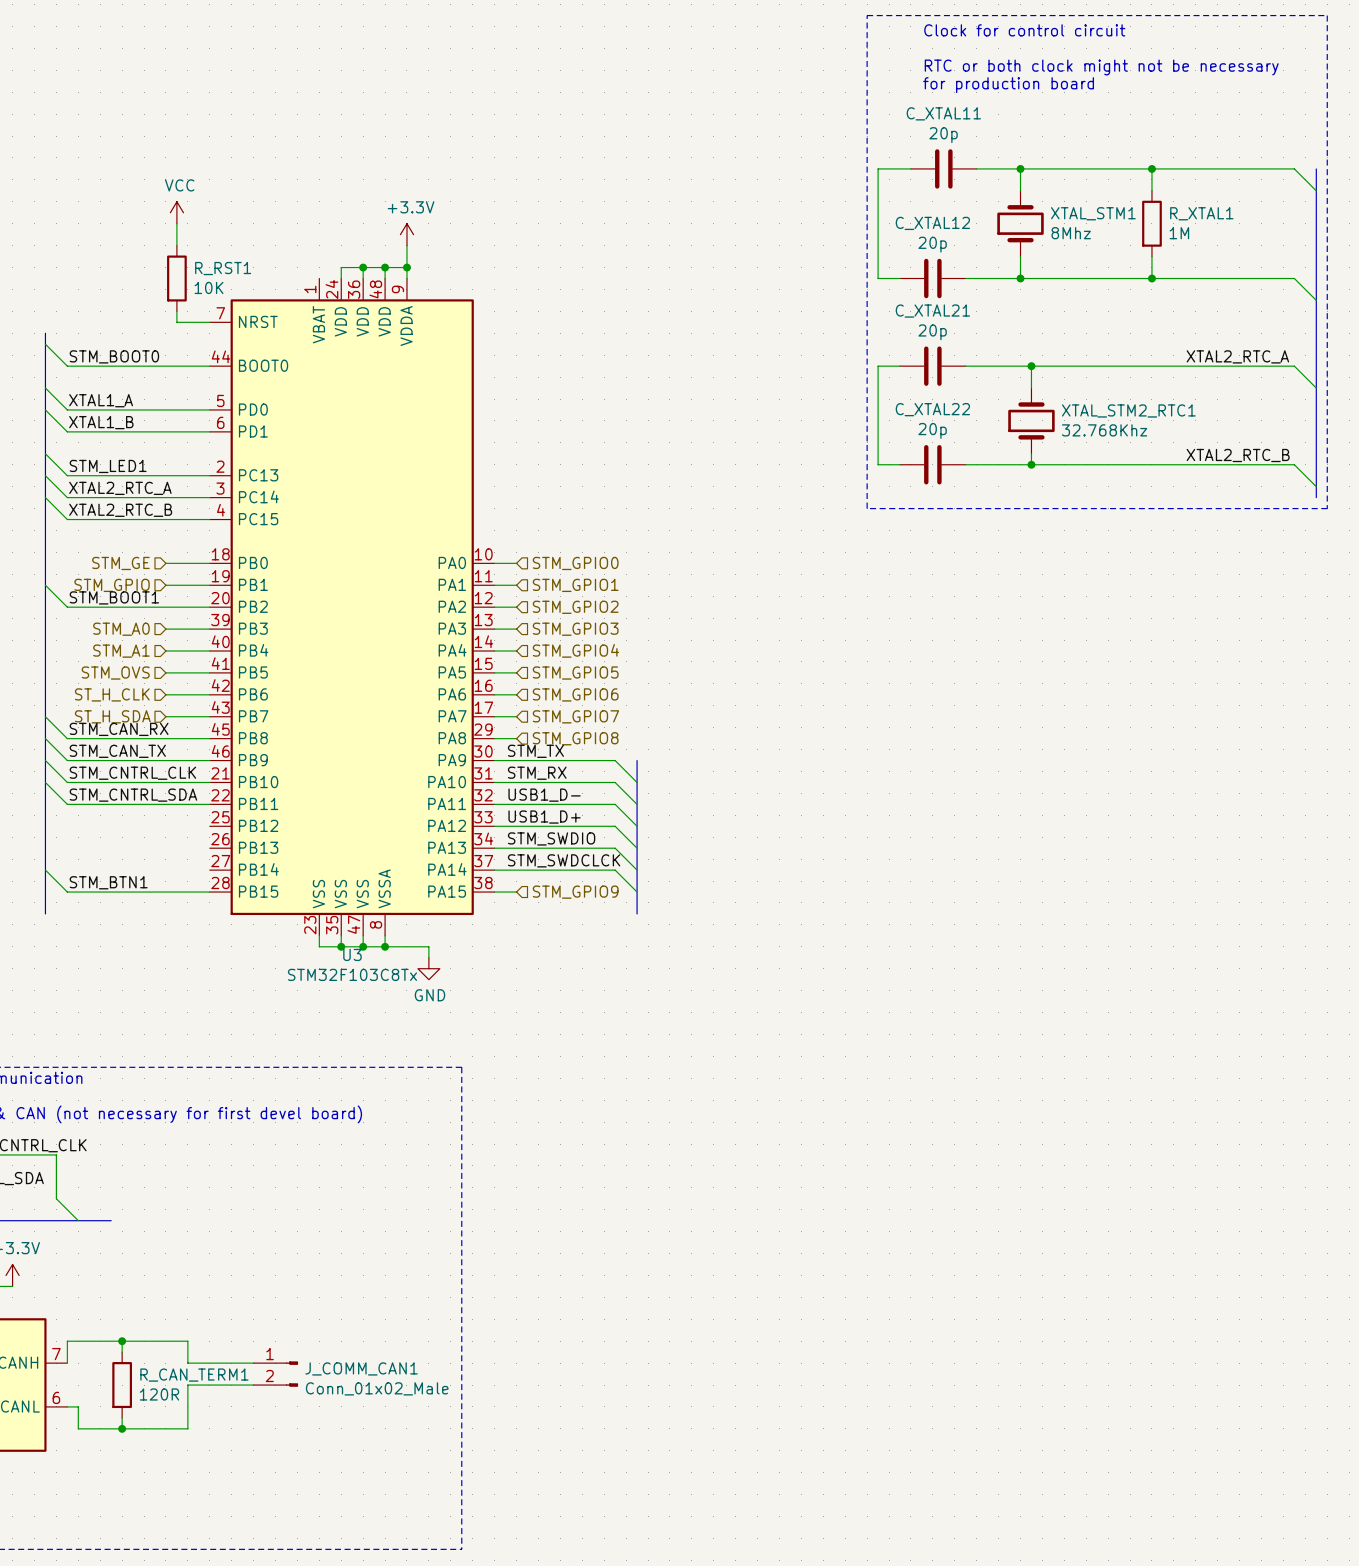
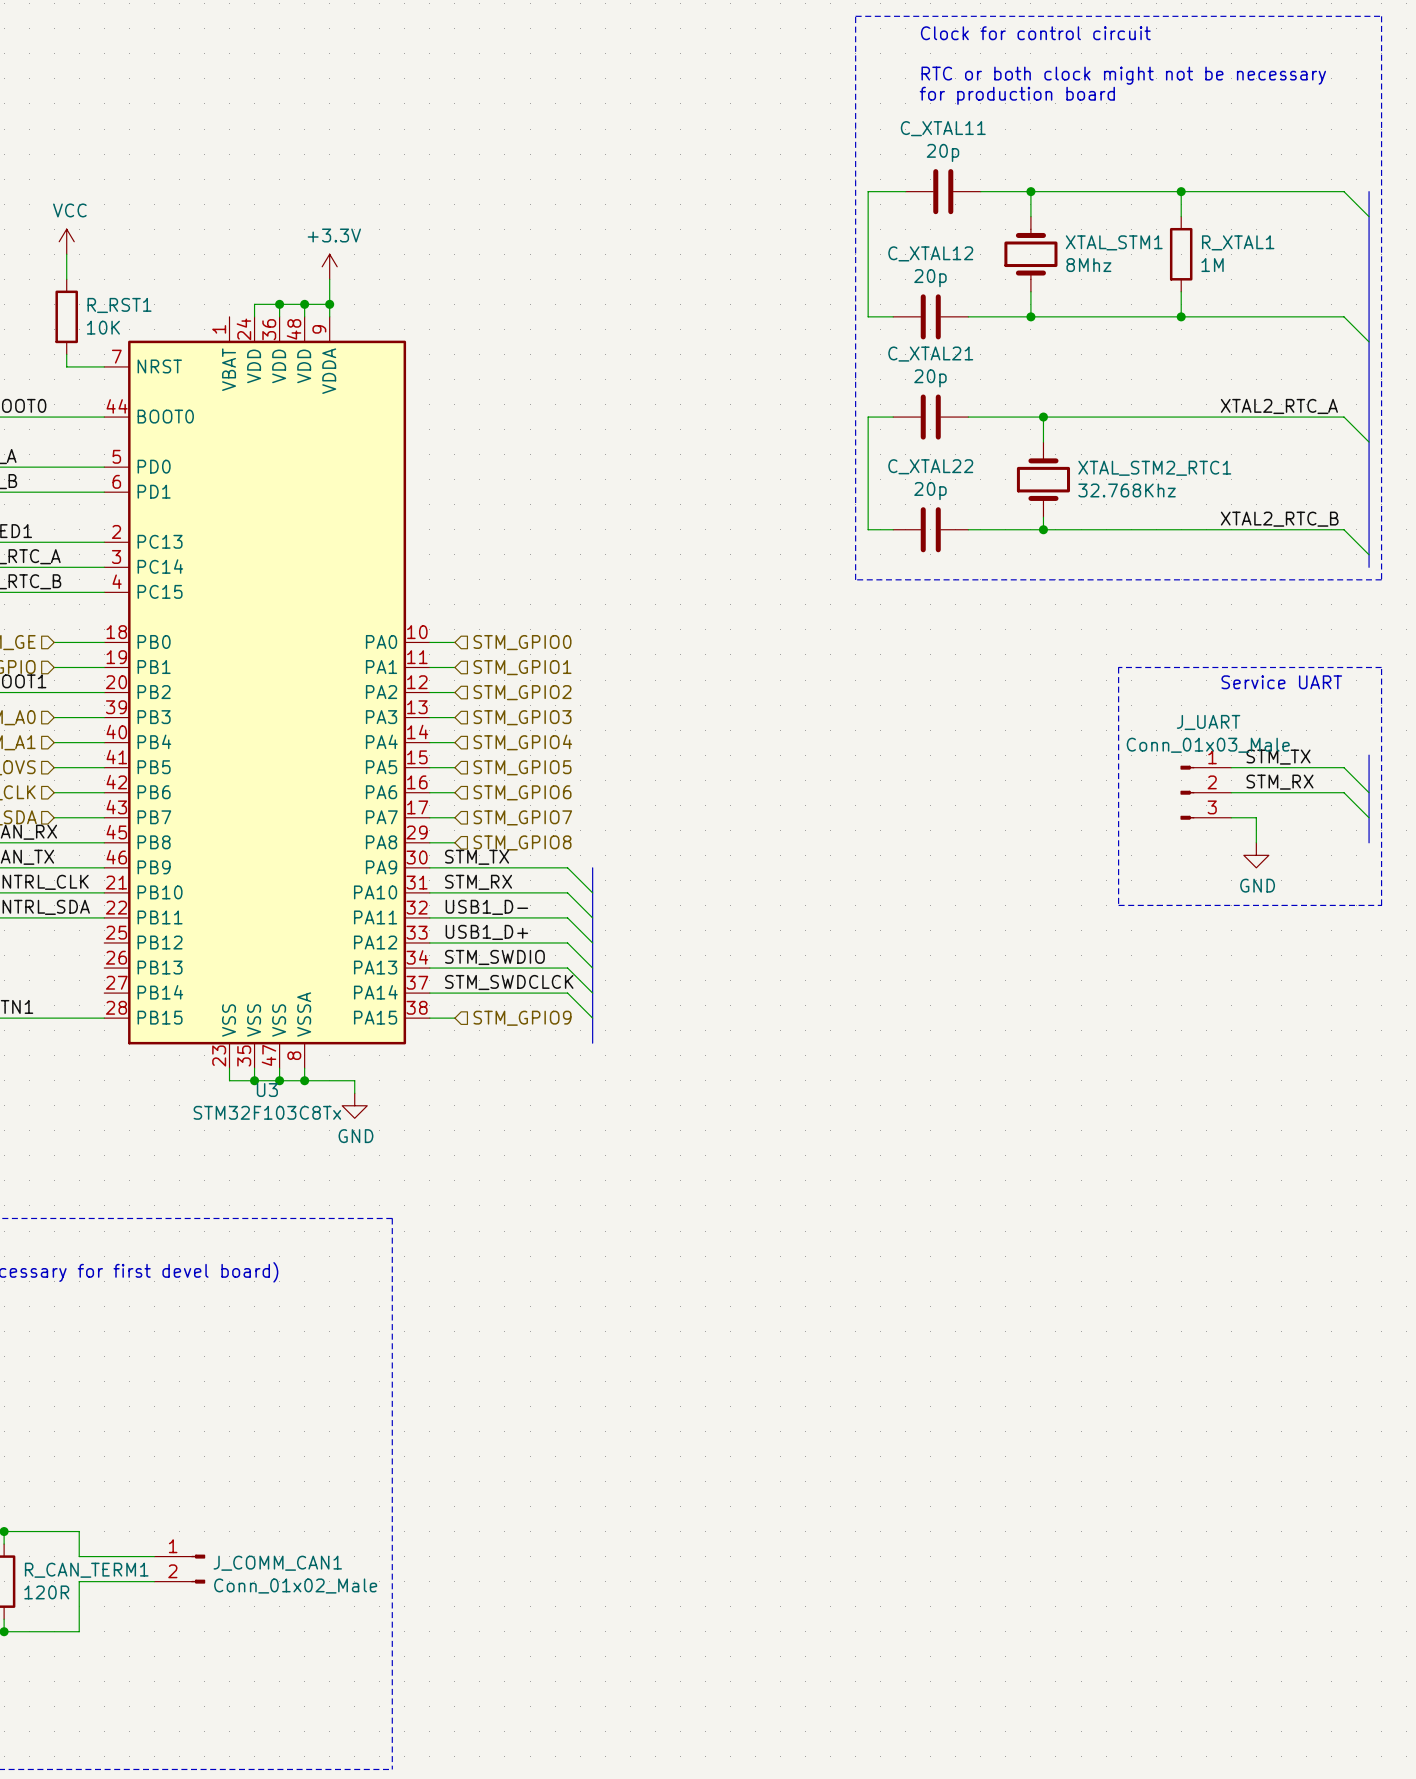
line: none -> (1118, 667) (1381, 667) (1381, 905) (1118, 905) (1118, 667)
text: none -> Service UART (1281, 682)
bus: none -> (1369, 755) (1369, 842)
label: none -> STM_TX (1278, 757)
wire: none -> (1231, 767) (1344, 767) (1369, 792)
label: none -> STM_RX (1279, 782)
J_UART: none -> Conn_01x03_Male (1205, 792)
wire: none -> (1231, 792) (1344, 792) (1369, 817)
wire: none -> (1231, 817) (1256, 817) (1256, 842)
power symbol: none -> GND (1256, 855)

